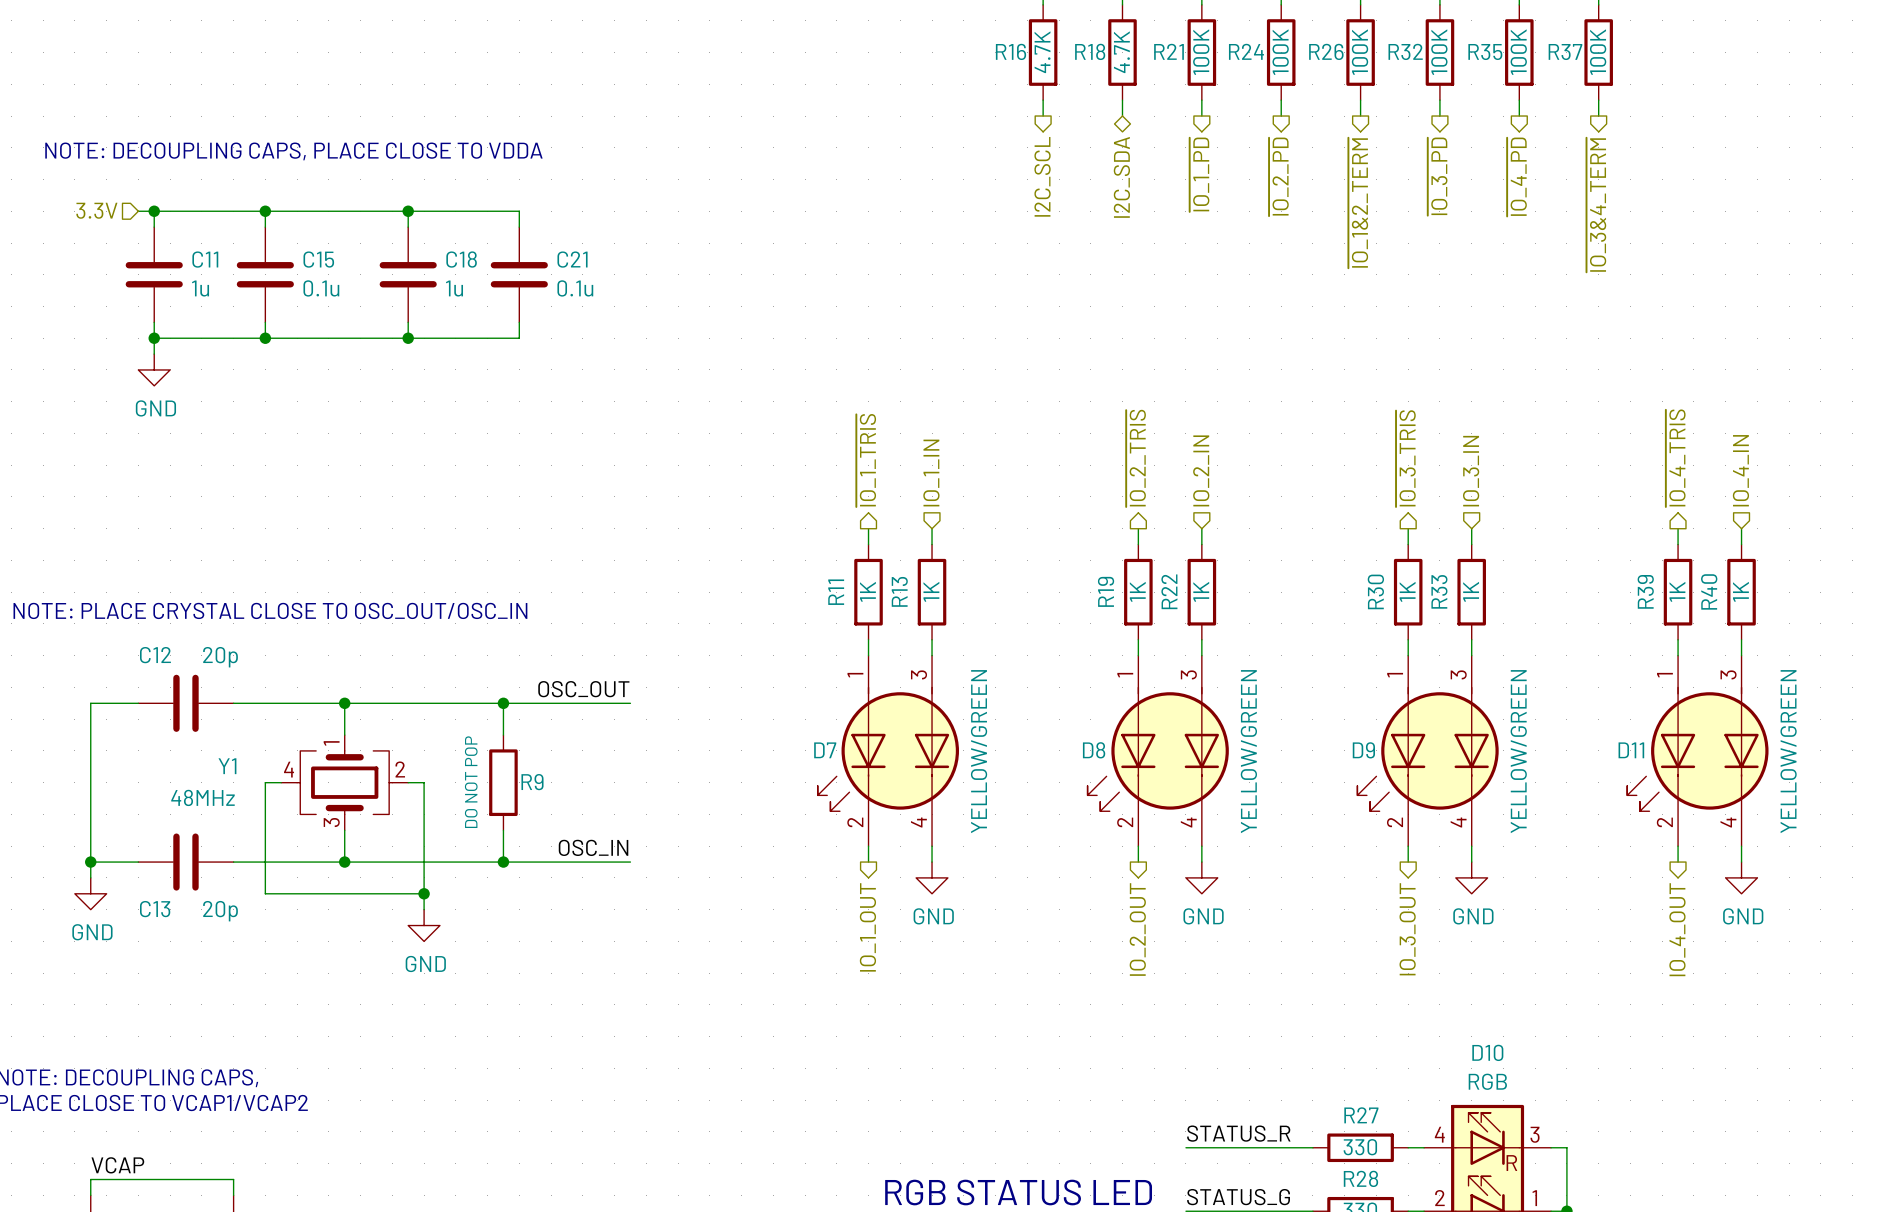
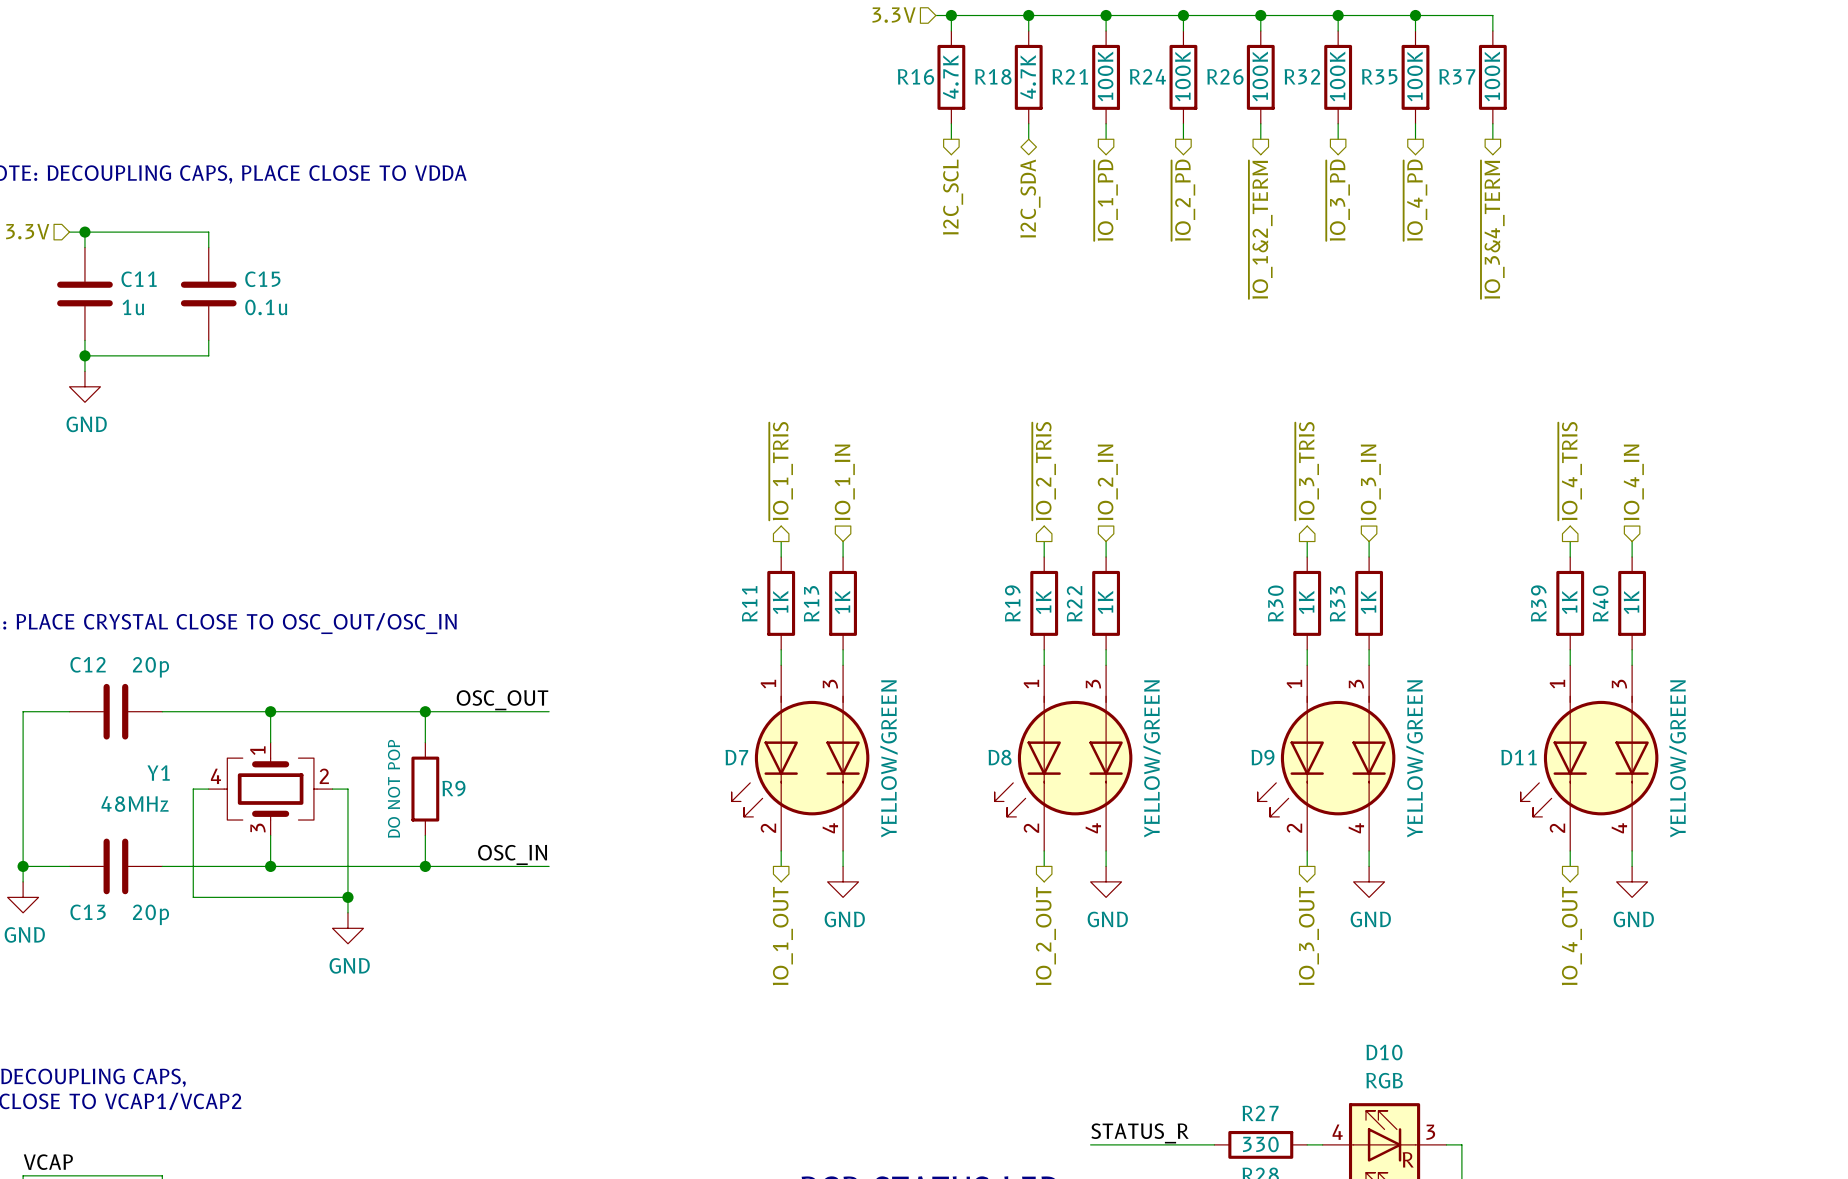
wire: (265, 211) (265, 227) -> none
junction: (265, 211) -> none
wire: (281, 211) (519, 211) (519, 227) -> (208, 232) (208, 247)
wire: (408, 211) (408, 227) -> none
junction: (408, 211) -> none
C15 position: (265, 274) -> (208, 293)
C18: 1u (408, 274) -> none
C21: 0.1u (519, 274) -> none
wire: (265, 322) (265, 338) -> none
wire: (408, 322) (408, 338) -> none
wire: (519, 322) (519, 338) (281, 338) -> (208, 340) (208, 355)
junction: (265, 338) -> none
junction: (408, 338) -> none

